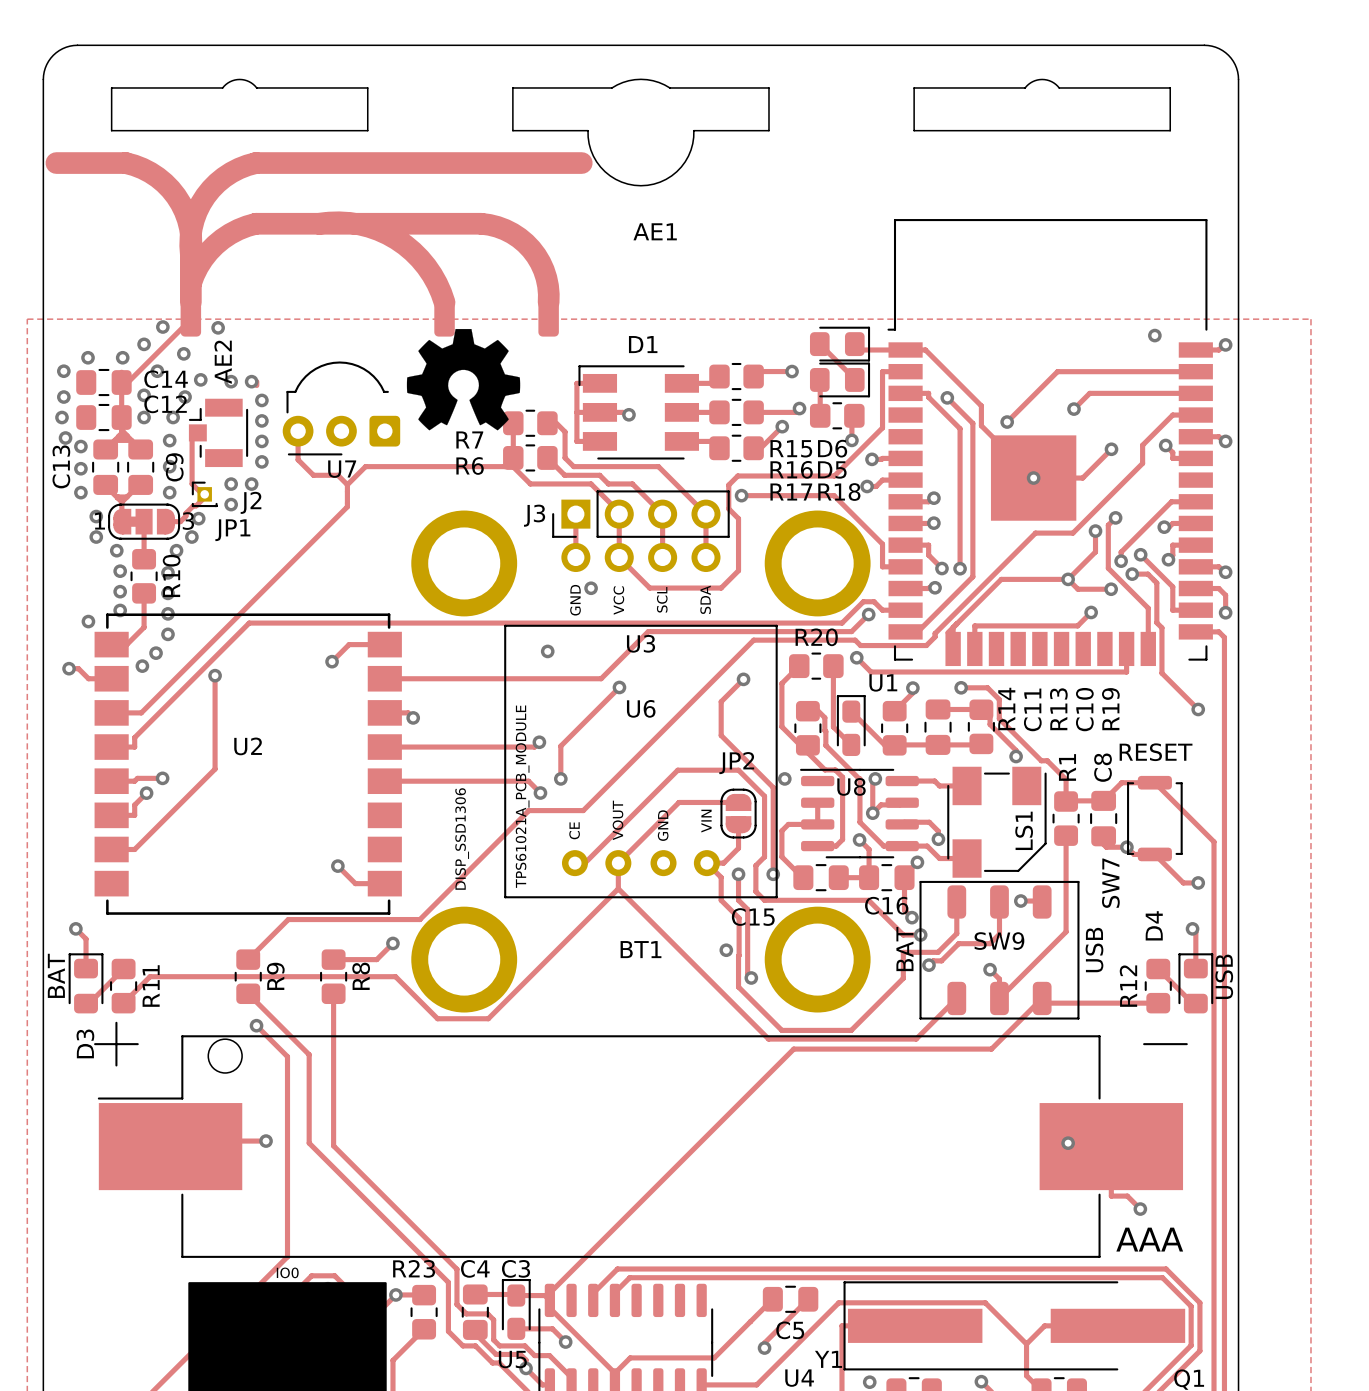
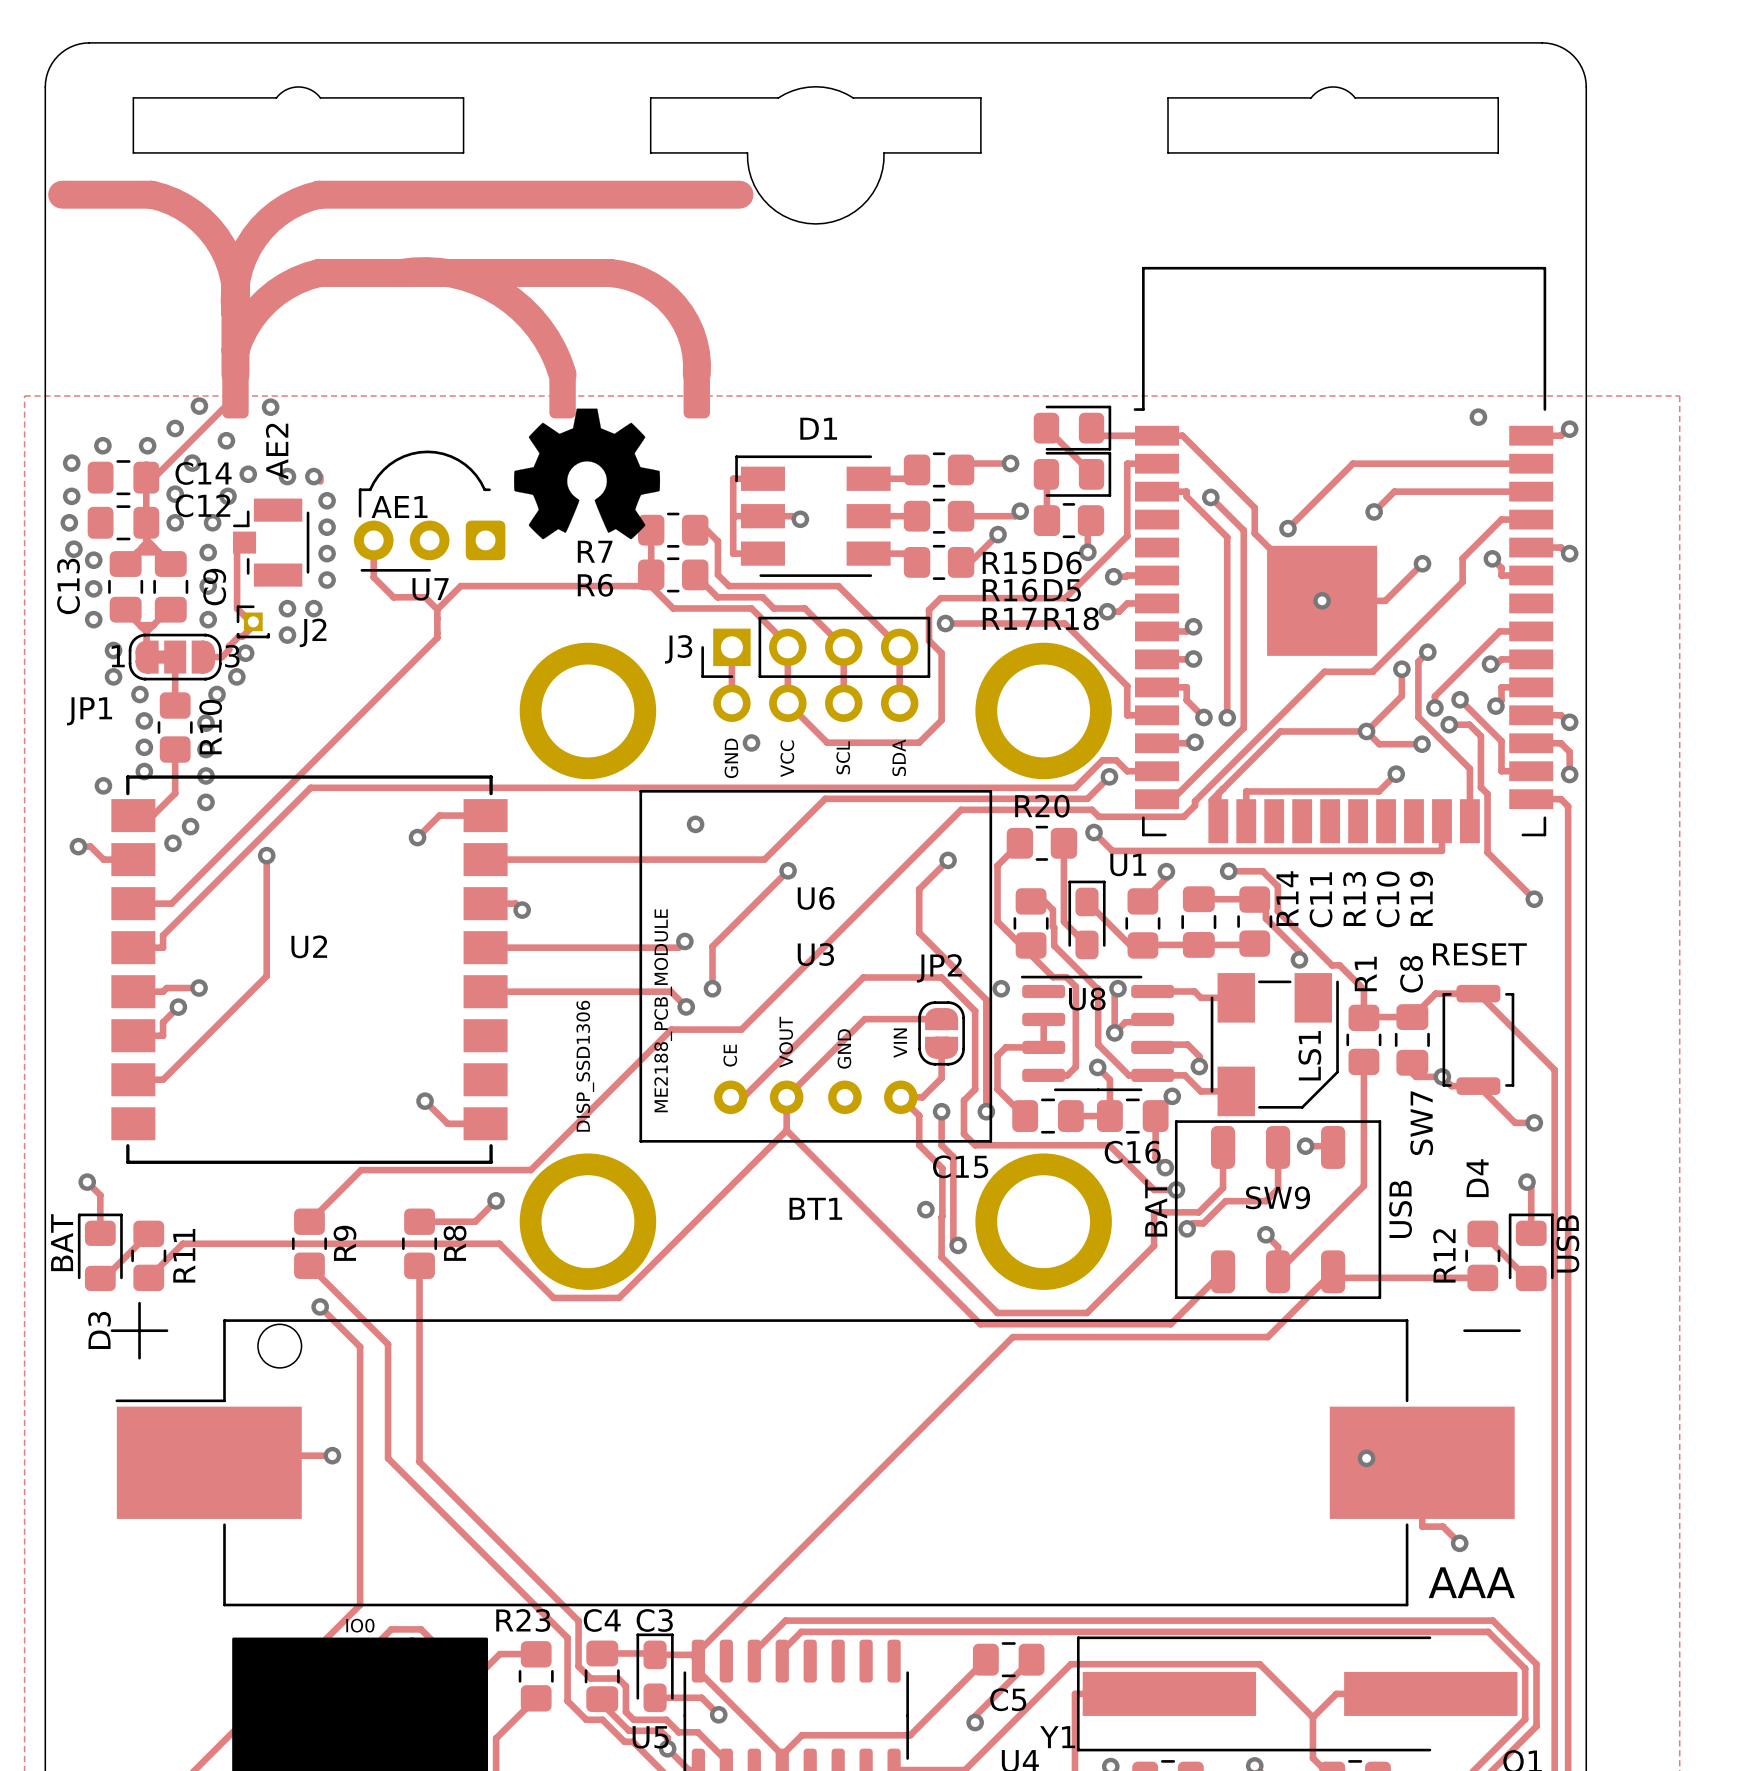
AE1 name position: AE1 (655, 231) -> AE1 (399, 507)
JP1 name position: JP1 (232, 530) -> JP1 (89, 711)
U3 name position: U3 (641, 643) -> U3 (815, 954)
text: TPS61021A_PCB_MODULE (522, 796) -> ME2188_PCB_MODULE (663, 1010)
via: (395, 1294) -> none

